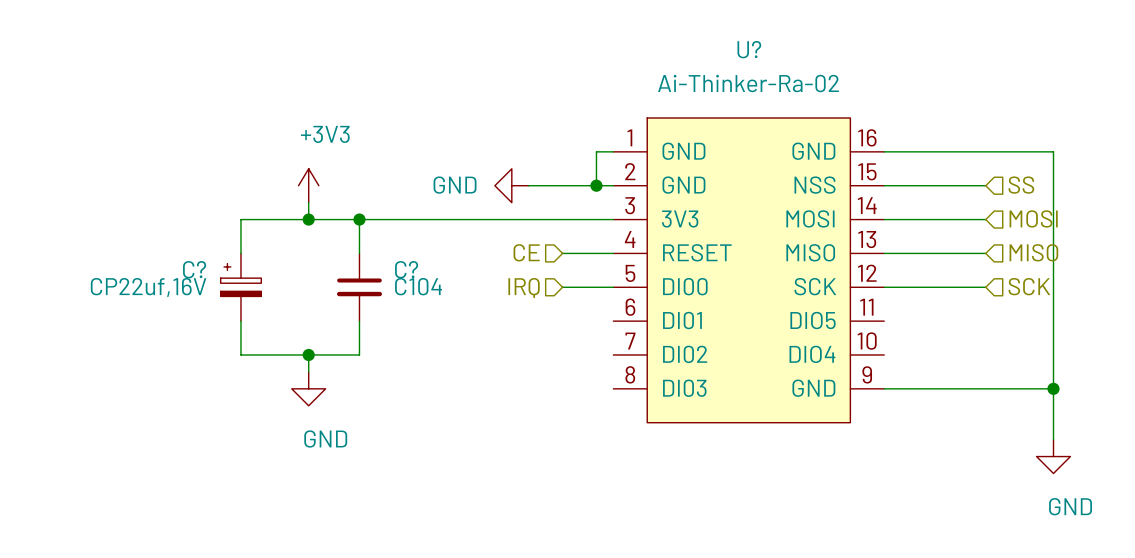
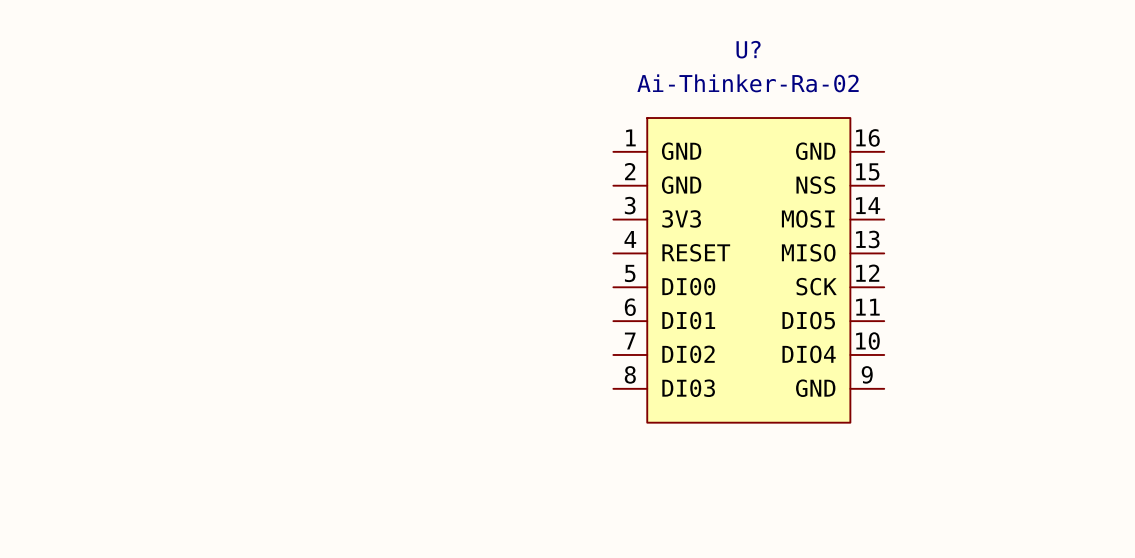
wire: (613, 151) (596, 151) (596, 185) -> none
wire: (884, 151) (1053, 151) (1053, 439) -> none
power symbol: +3V3 (308, 185) -> none
power symbol: GND (511, 185) -> none
wire: (528, 185) (613, 185) -> none
junction: (596, 185) -> none
wire: (884, 185) (985, 185) -> none
hierarchical label: SS (1021, 185) -> none
wire: (308, 202) (308, 219) -> none
hierarchical label: MOSI (1033, 218) -> none
junction: (308, 219) -> none
wire: (359, 219) (359, 253) -> none
junction: (359, 219) -> none
wire: (613, 219) (240, 219) (240, 253) -> none
wire: (884, 219) (985, 219) -> none
hierarchical label: CE (526, 252) -> none
hierarchical label: MISO (1033, 252) -> none
wire: (562, 253) (613, 253) -> none
wire: (884, 253) (985, 253) -> none
hierarchical label: SCK (1029, 286) -> none
C?: CP22uf,16V (240, 287) -> none
C?: C104 (359, 287) -> none
hierarchical label: IRQ (524, 287) -> none
wire: (562, 287) (613, 287) -> none
wire: (884, 287) (985, 287) -> none
wire: (240, 321) (240, 354) (359, 354) (359, 321) -> none
wire: (308, 354) (308, 371) -> none
junction: (308, 354) -> none
power symbol: GND (308, 388) -> none
wire: (884, 388) (1053, 388) -> none
junction: (1053, 388) -> none
power symbol: GND (1053, 456) -> none

